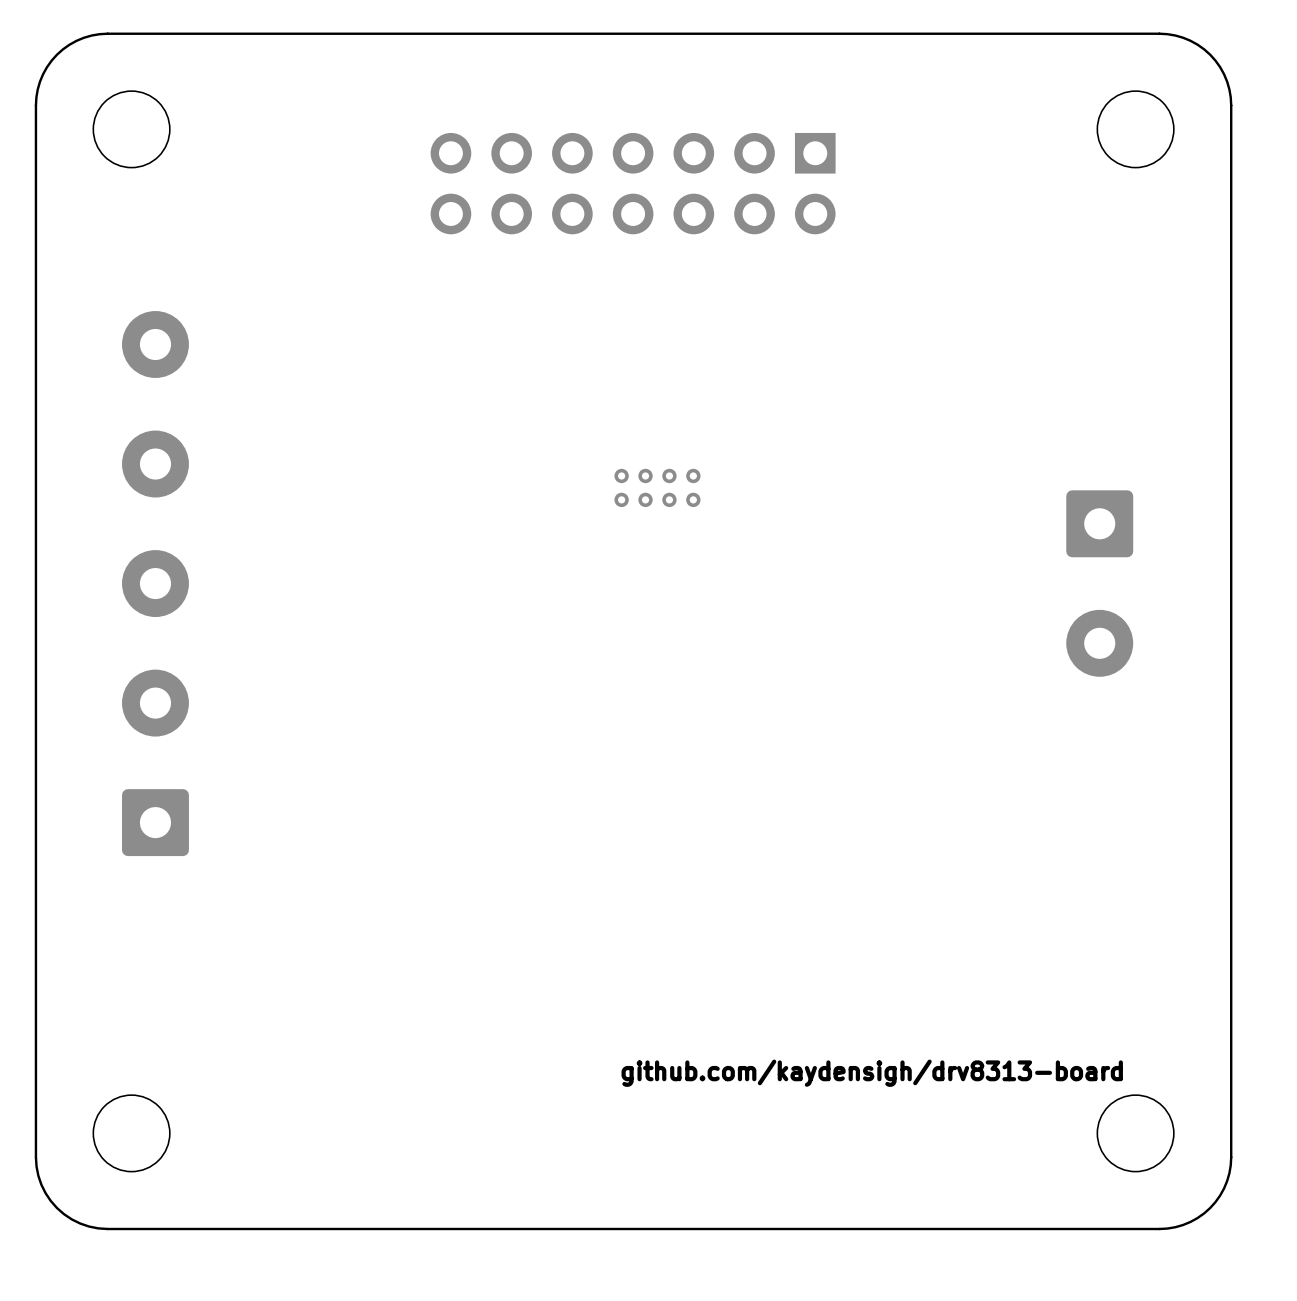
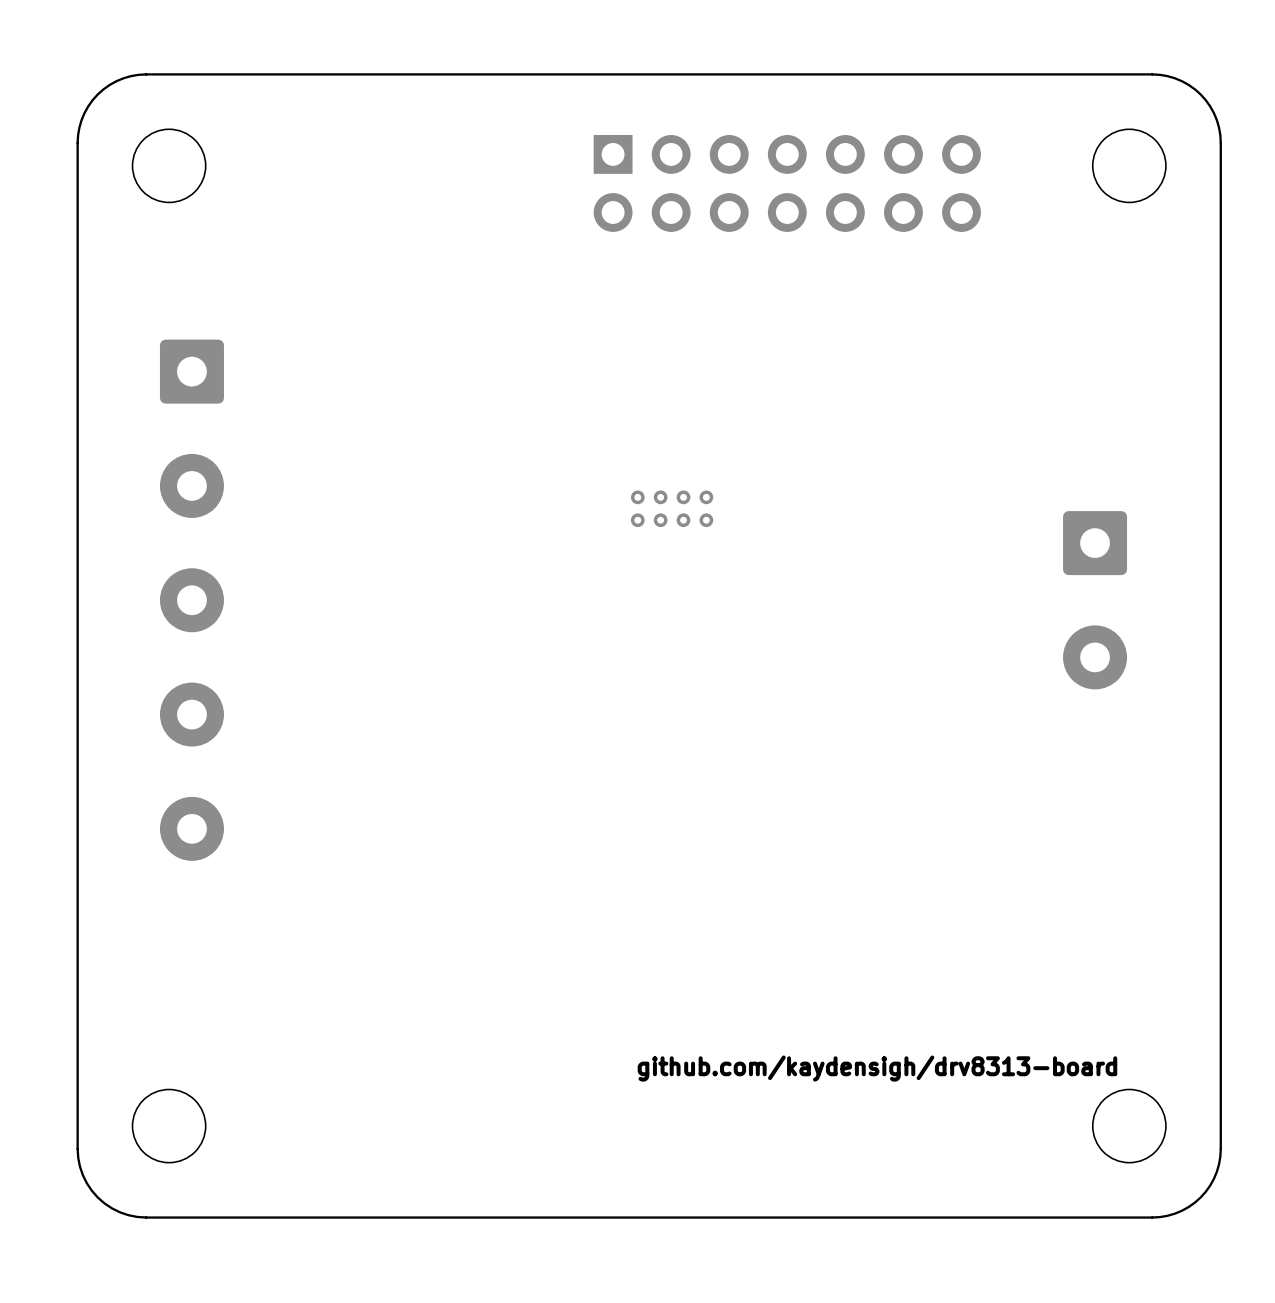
part: none -> (787, 183)
part: (633, 183) -> none
part rotation: 0° (155, 583) -> 180° (191, 600)

